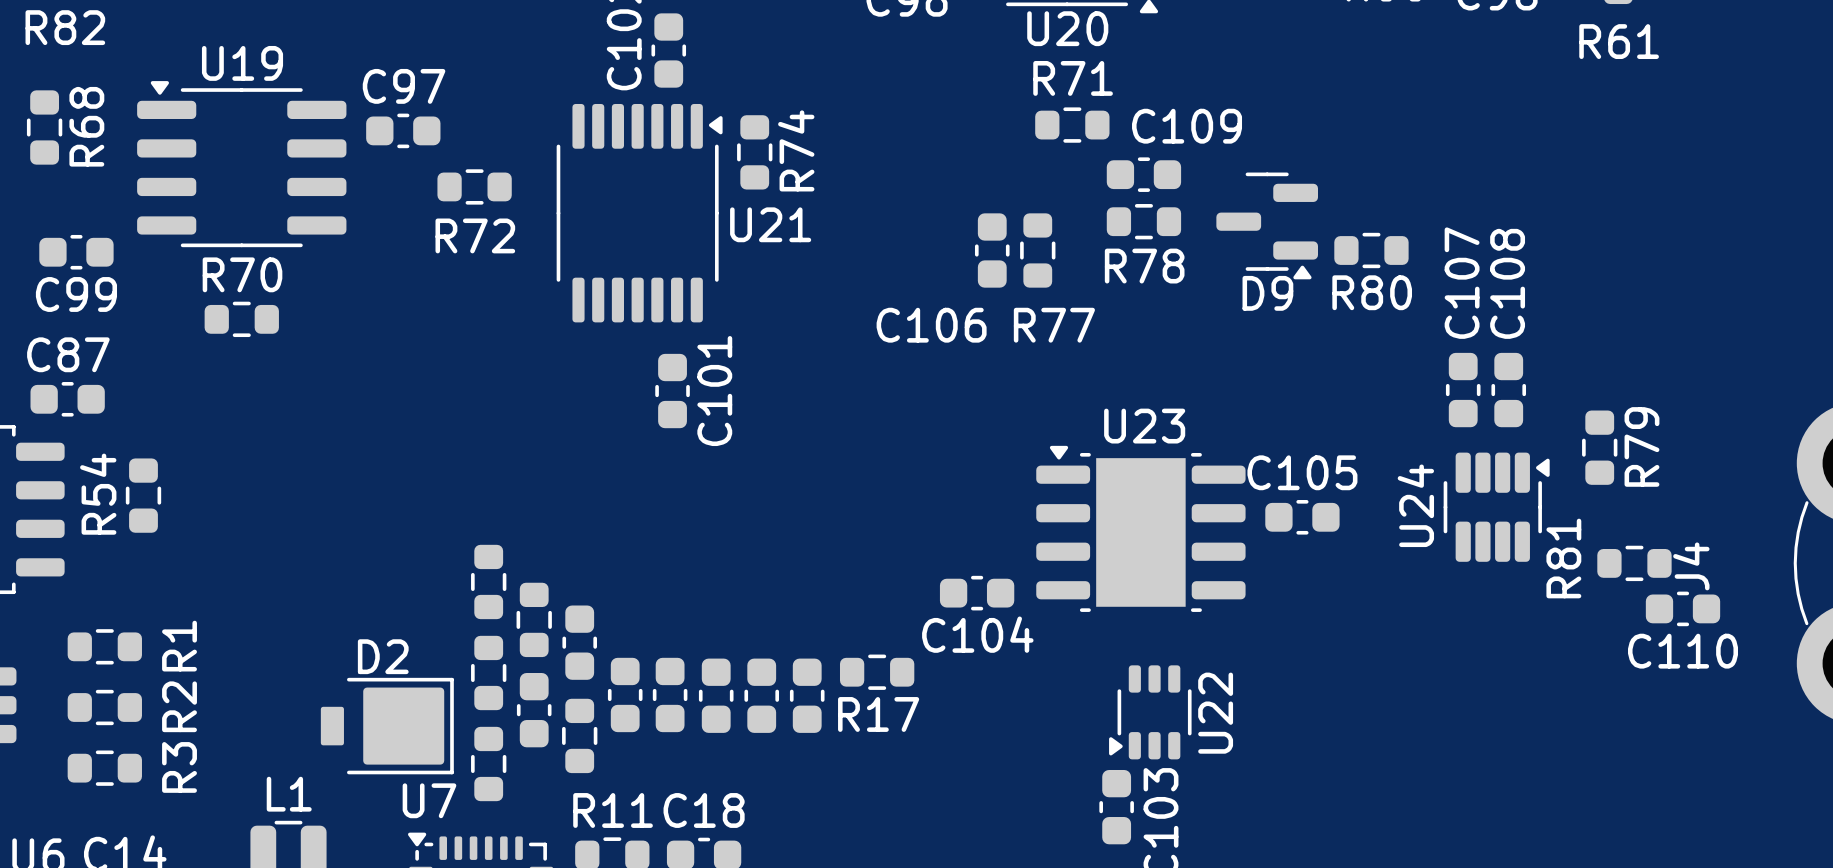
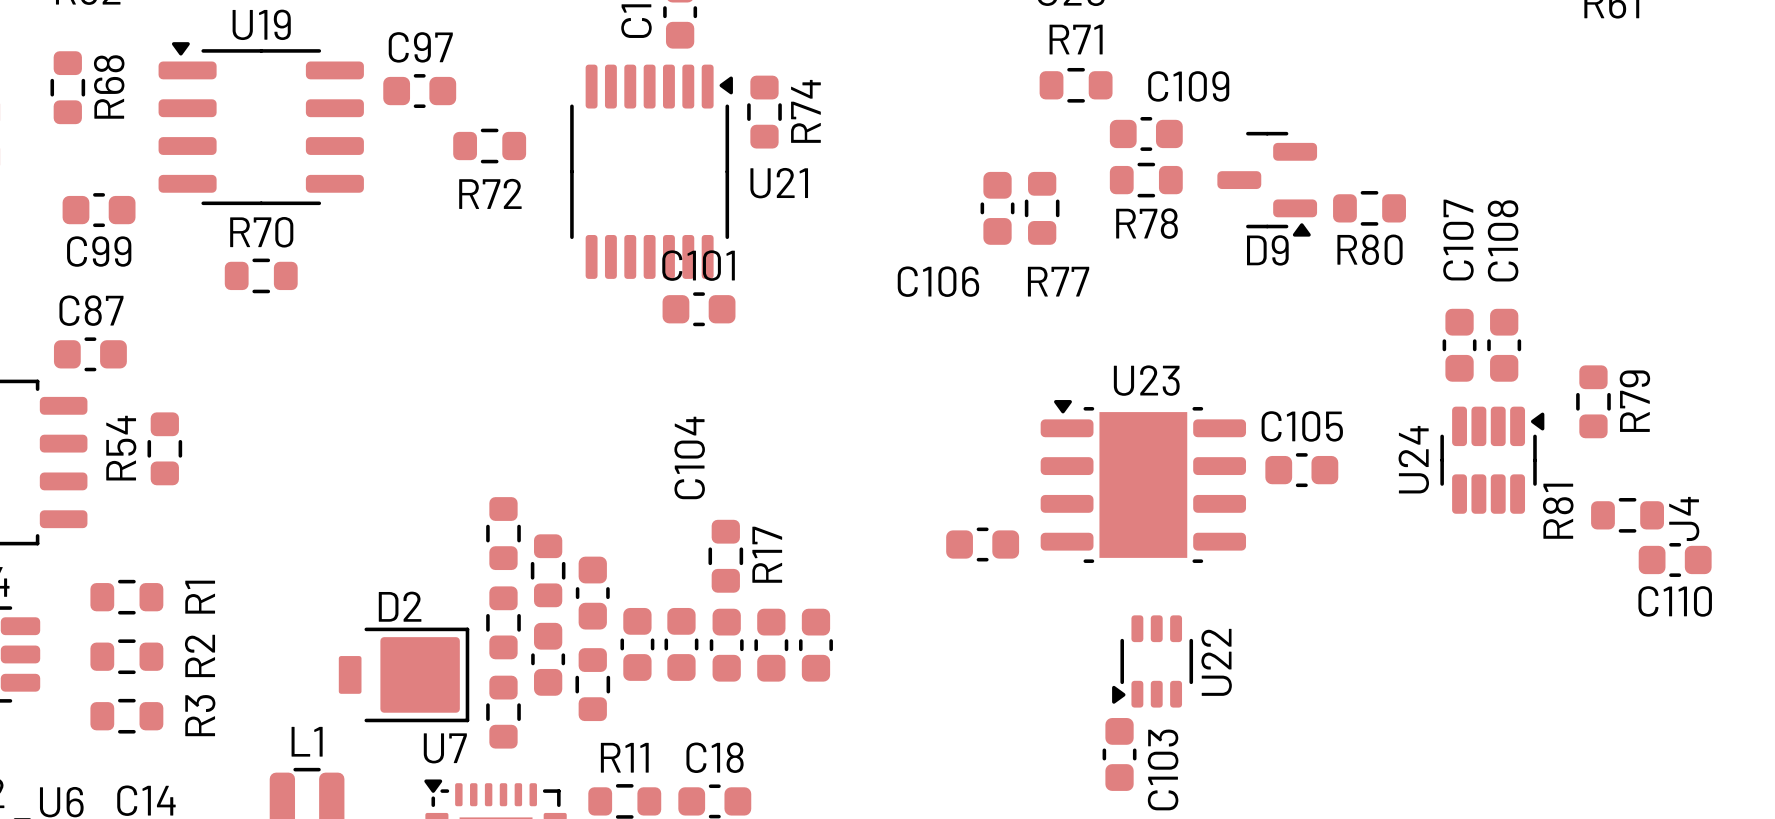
C101 rotation: 0° (672, 391) -> 90° clockwise (699, 309)
C101 name position: C101 (714, 391) -> C101 (698, 265)
C104 name rotation: 0° (977, 634) -> 90° counterclockwise (689, 457)
C104 name position: C104 (977, 634) -> C104 (689, 457)
R17 rotation: 0° (877, 672) -> 90° clockwise (725, 556)
R17 position: (877, 672) -> (725, 556)
R17 name position: R17 (878, 714) -> R17 (767, 554)

